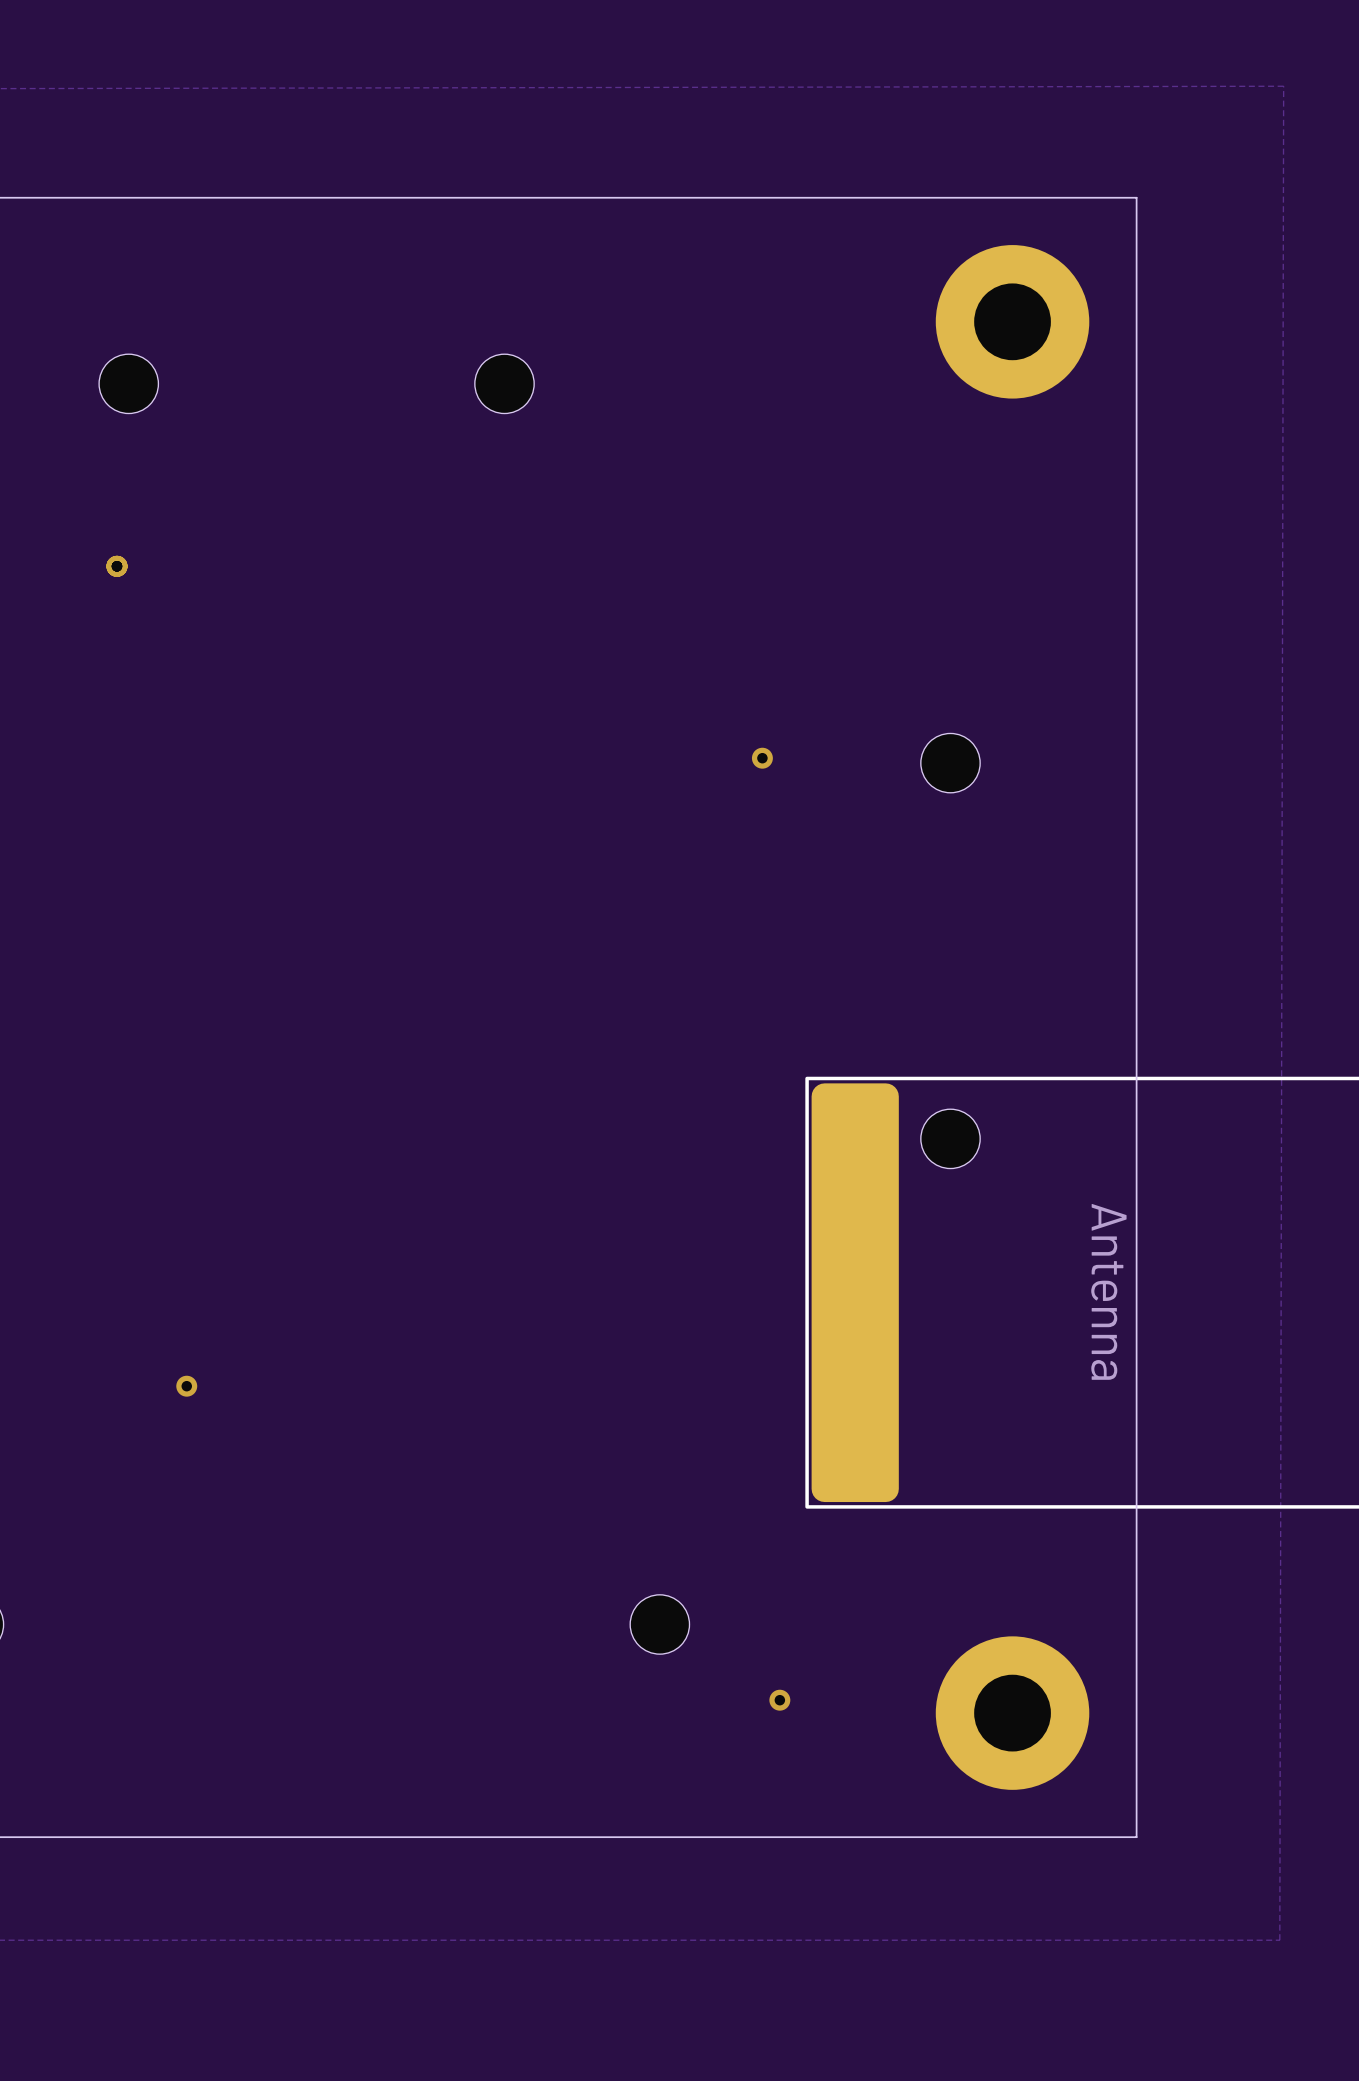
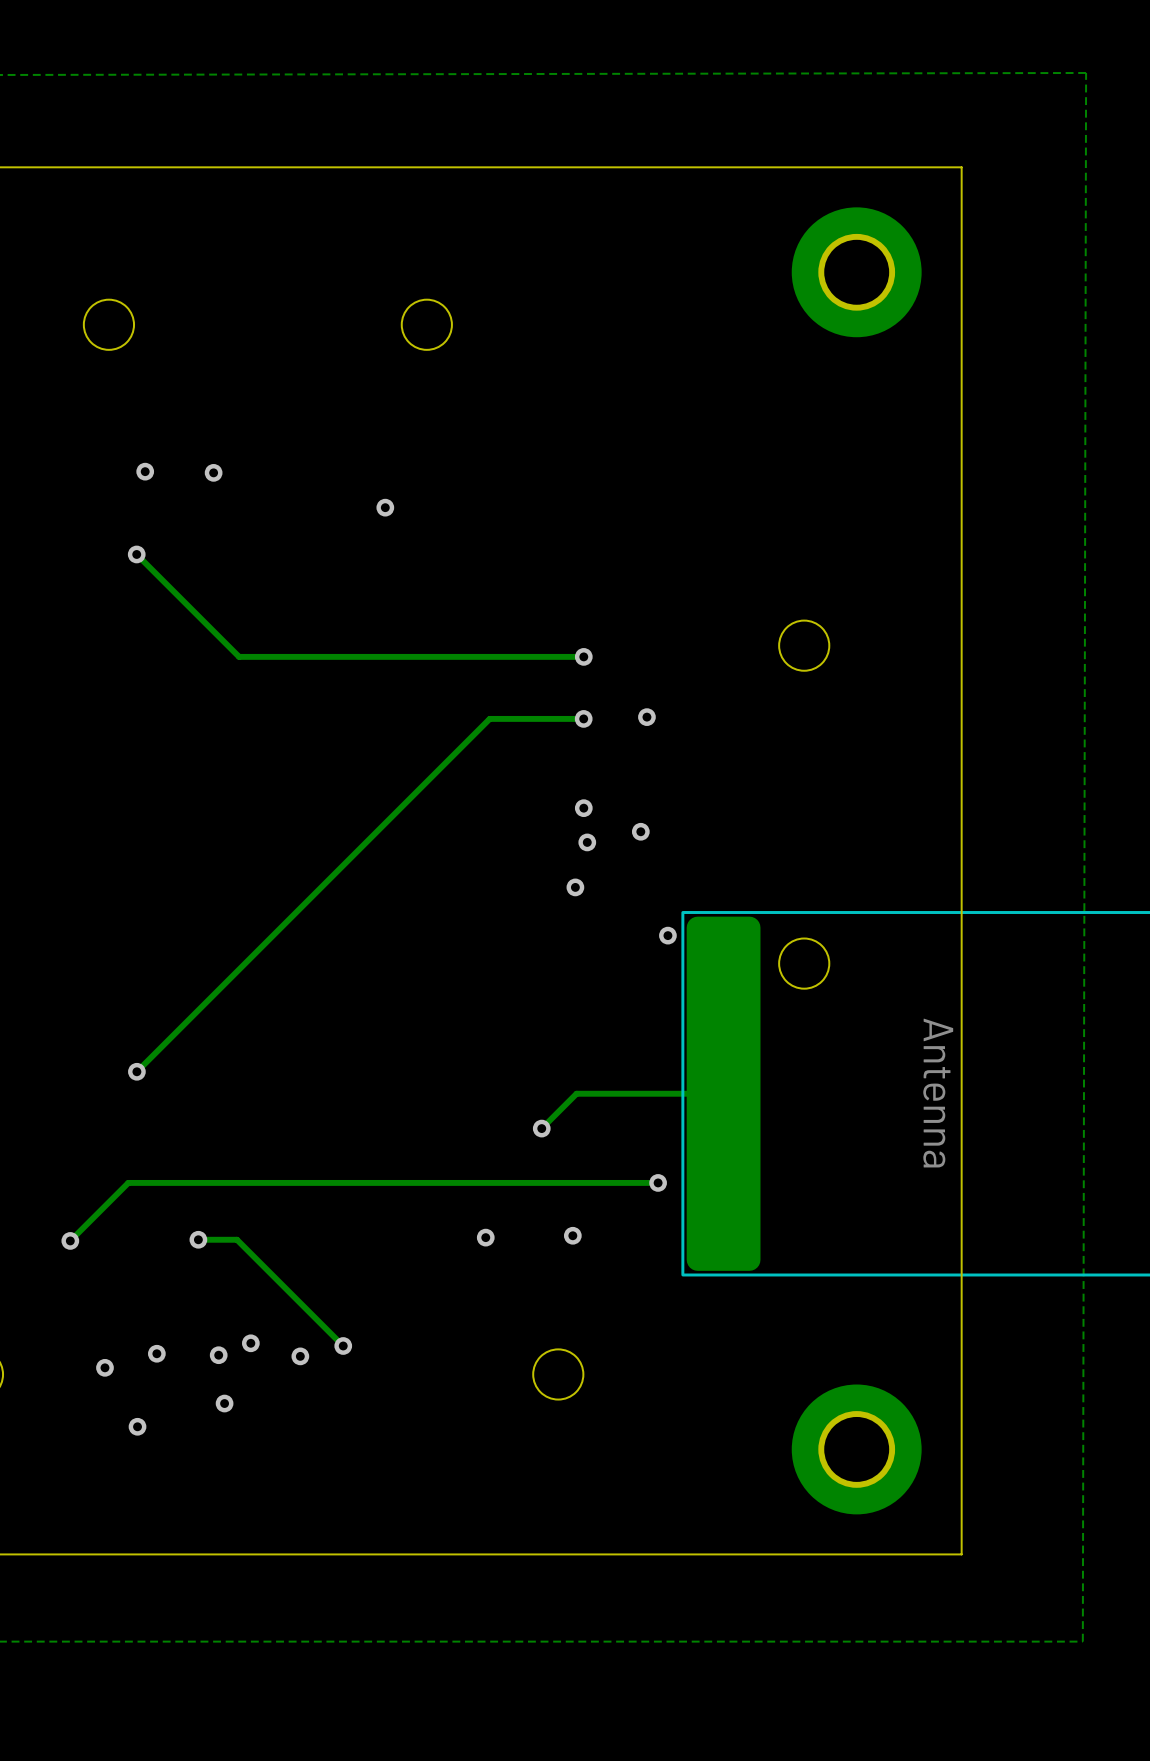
via: none -> (145, 471)
via: none -> (213, 472)
via: (116, 566) -> none
via: none -> (385, 507)
track: none -> (136, 554) (239, 656) (583, 656)
via: none -> (136, 554)
via: (762, 758) -> none
via: none -> (583, 656)
via: none -> (646, 717)
track: none -> (583, 718) (489, 718) (136, 1071)
via: none -> (583, 718)
via: none -> (583, 808)
via: none -> (640, 831)
via: none -> (587, 842)
via: none -> (575, 887)
via: none -> (667, 935)
via: none -> (136, 1071)
track: none -> (723, 1093) (576, 1093) (541, 1128)
via: none -> (541, 1128)
via: (186, 1386) -> none
track: none -> (658, 1182) (128, 1182) (70, 1240)
via: none -> (658, 1182)
via: none -> (572, 1235)
via: none -> (485, 1237)
track: none -> (198, 1239) (237, 1239) (343, 1345)
via: none -> (198, 1239)
via: none -> (70, 1240)
via: none -> (250, 1343)
via: none -> (343, 1345)
via: none -> (156, 1353)
via: none -> (218, 1355)
via: none -> (300, 1356)
via: none -> (104, 1367)
via: none -> (224, 1403)
via: none -> (137, 1426)
via: (779, 1700) -> none

